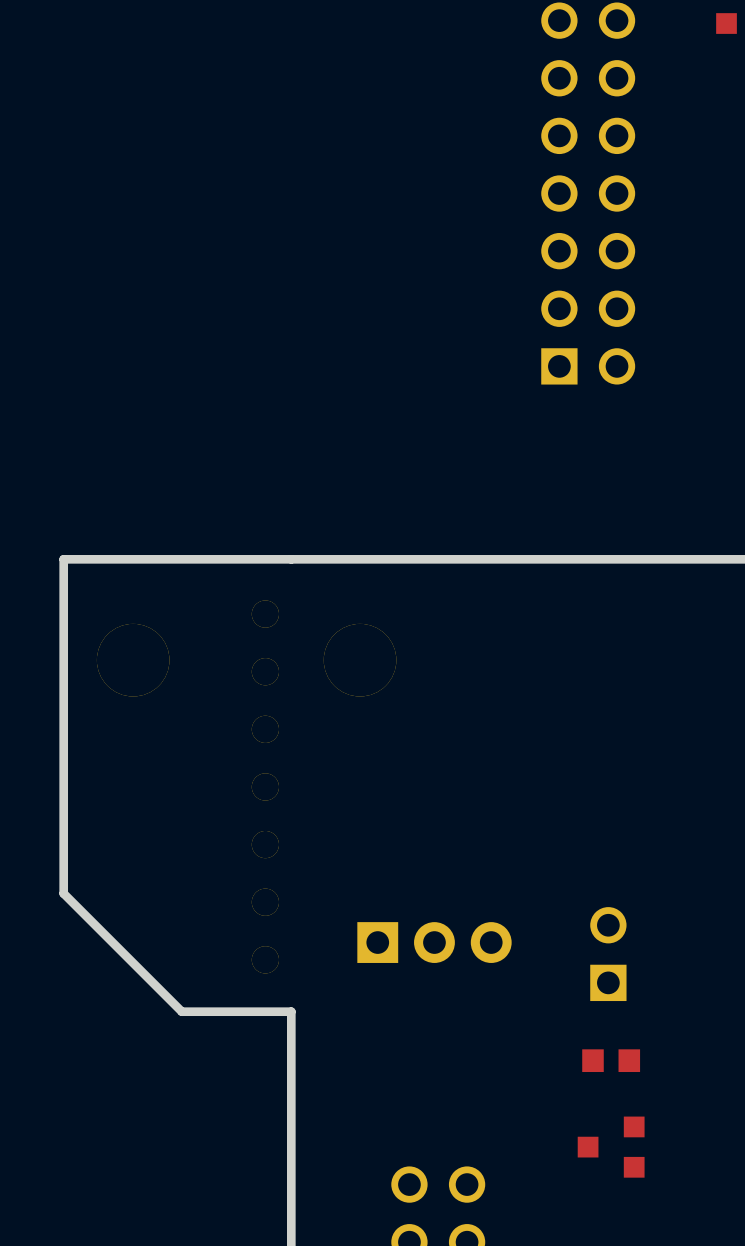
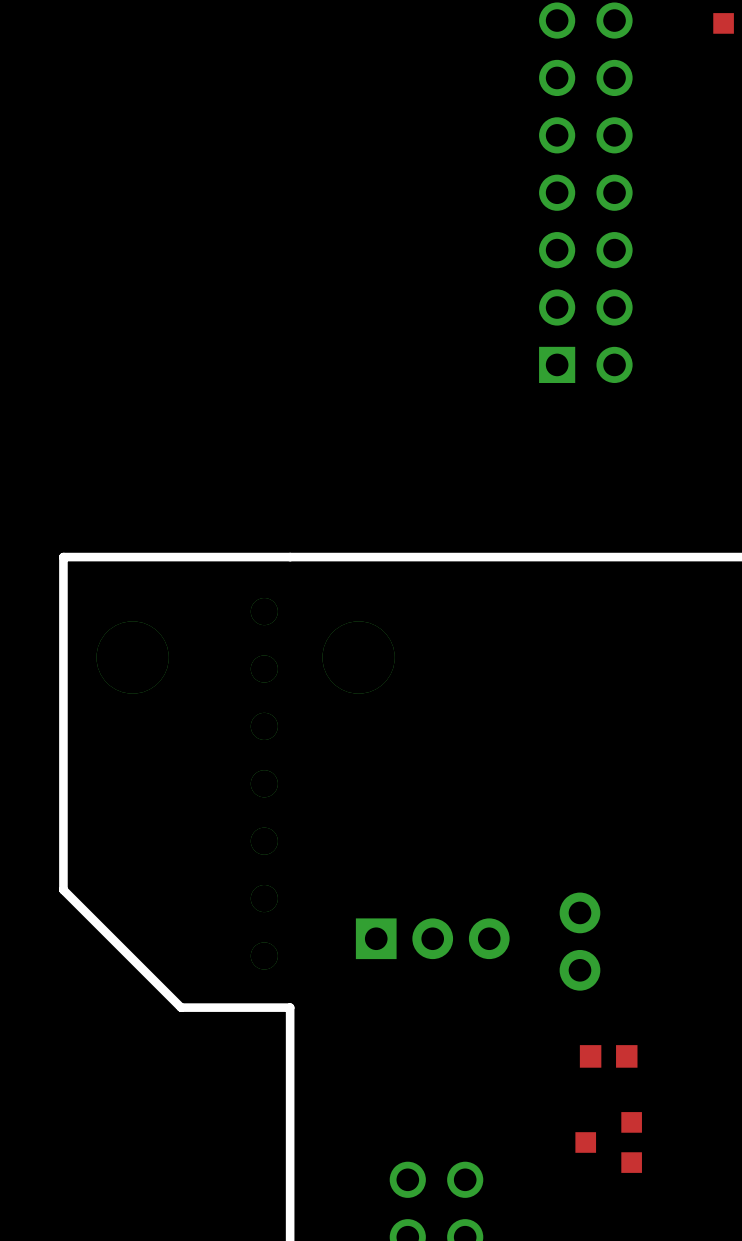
part: none -> (579, 912)
part: (608, 954) -> none
part: none -> (579, 970)

